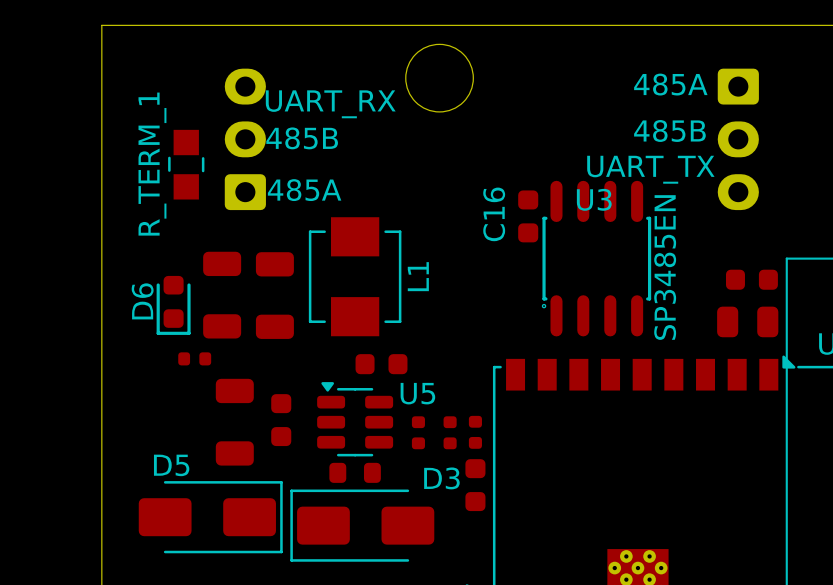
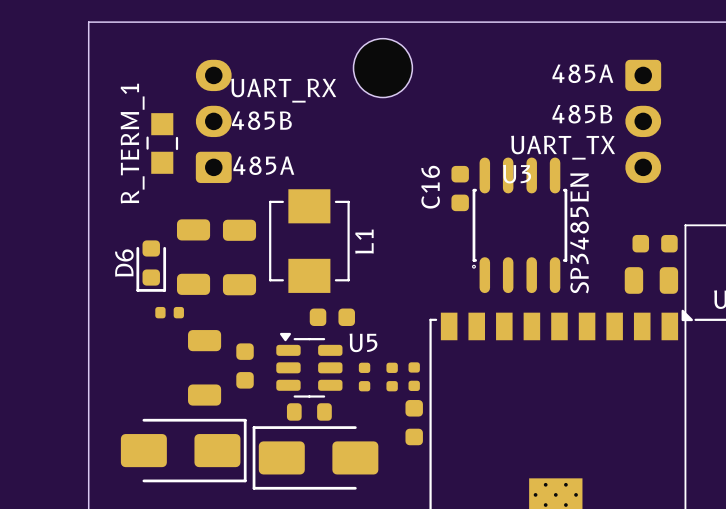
D5: (210, 517) -> none
part: none -> (183, 450)
D3: (362, 525) -> none
part: none -> (315, 457)

